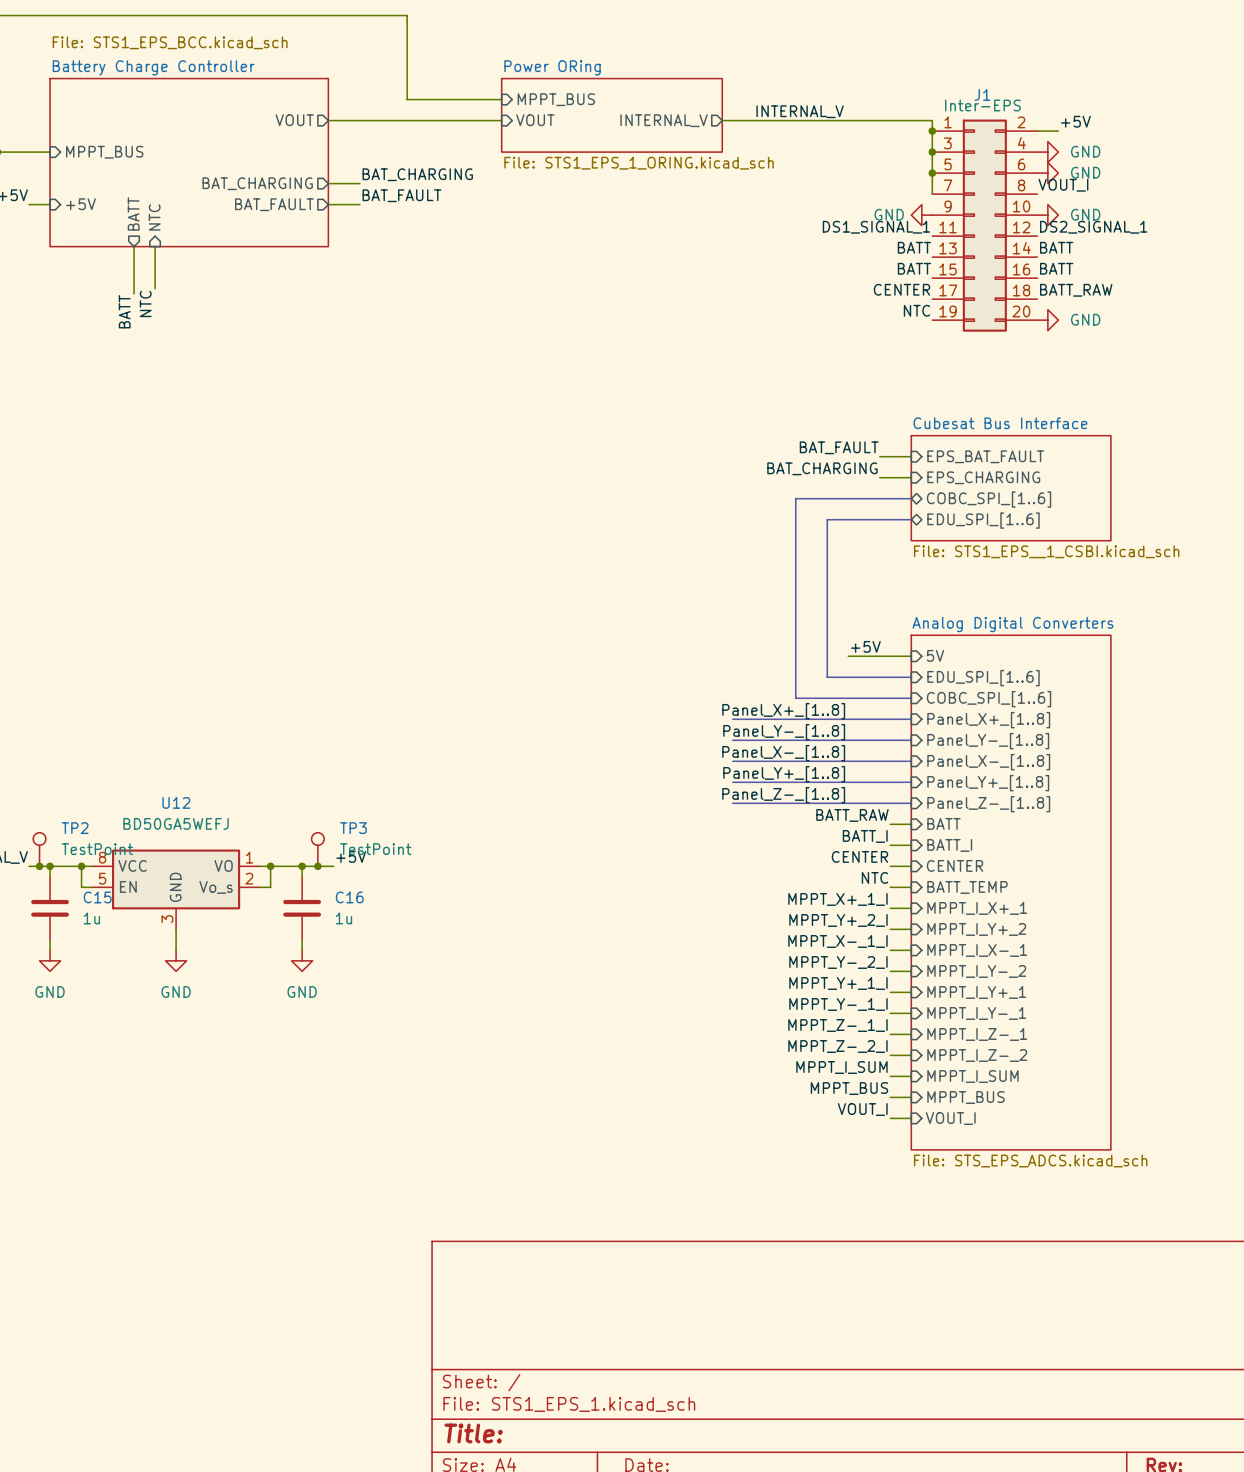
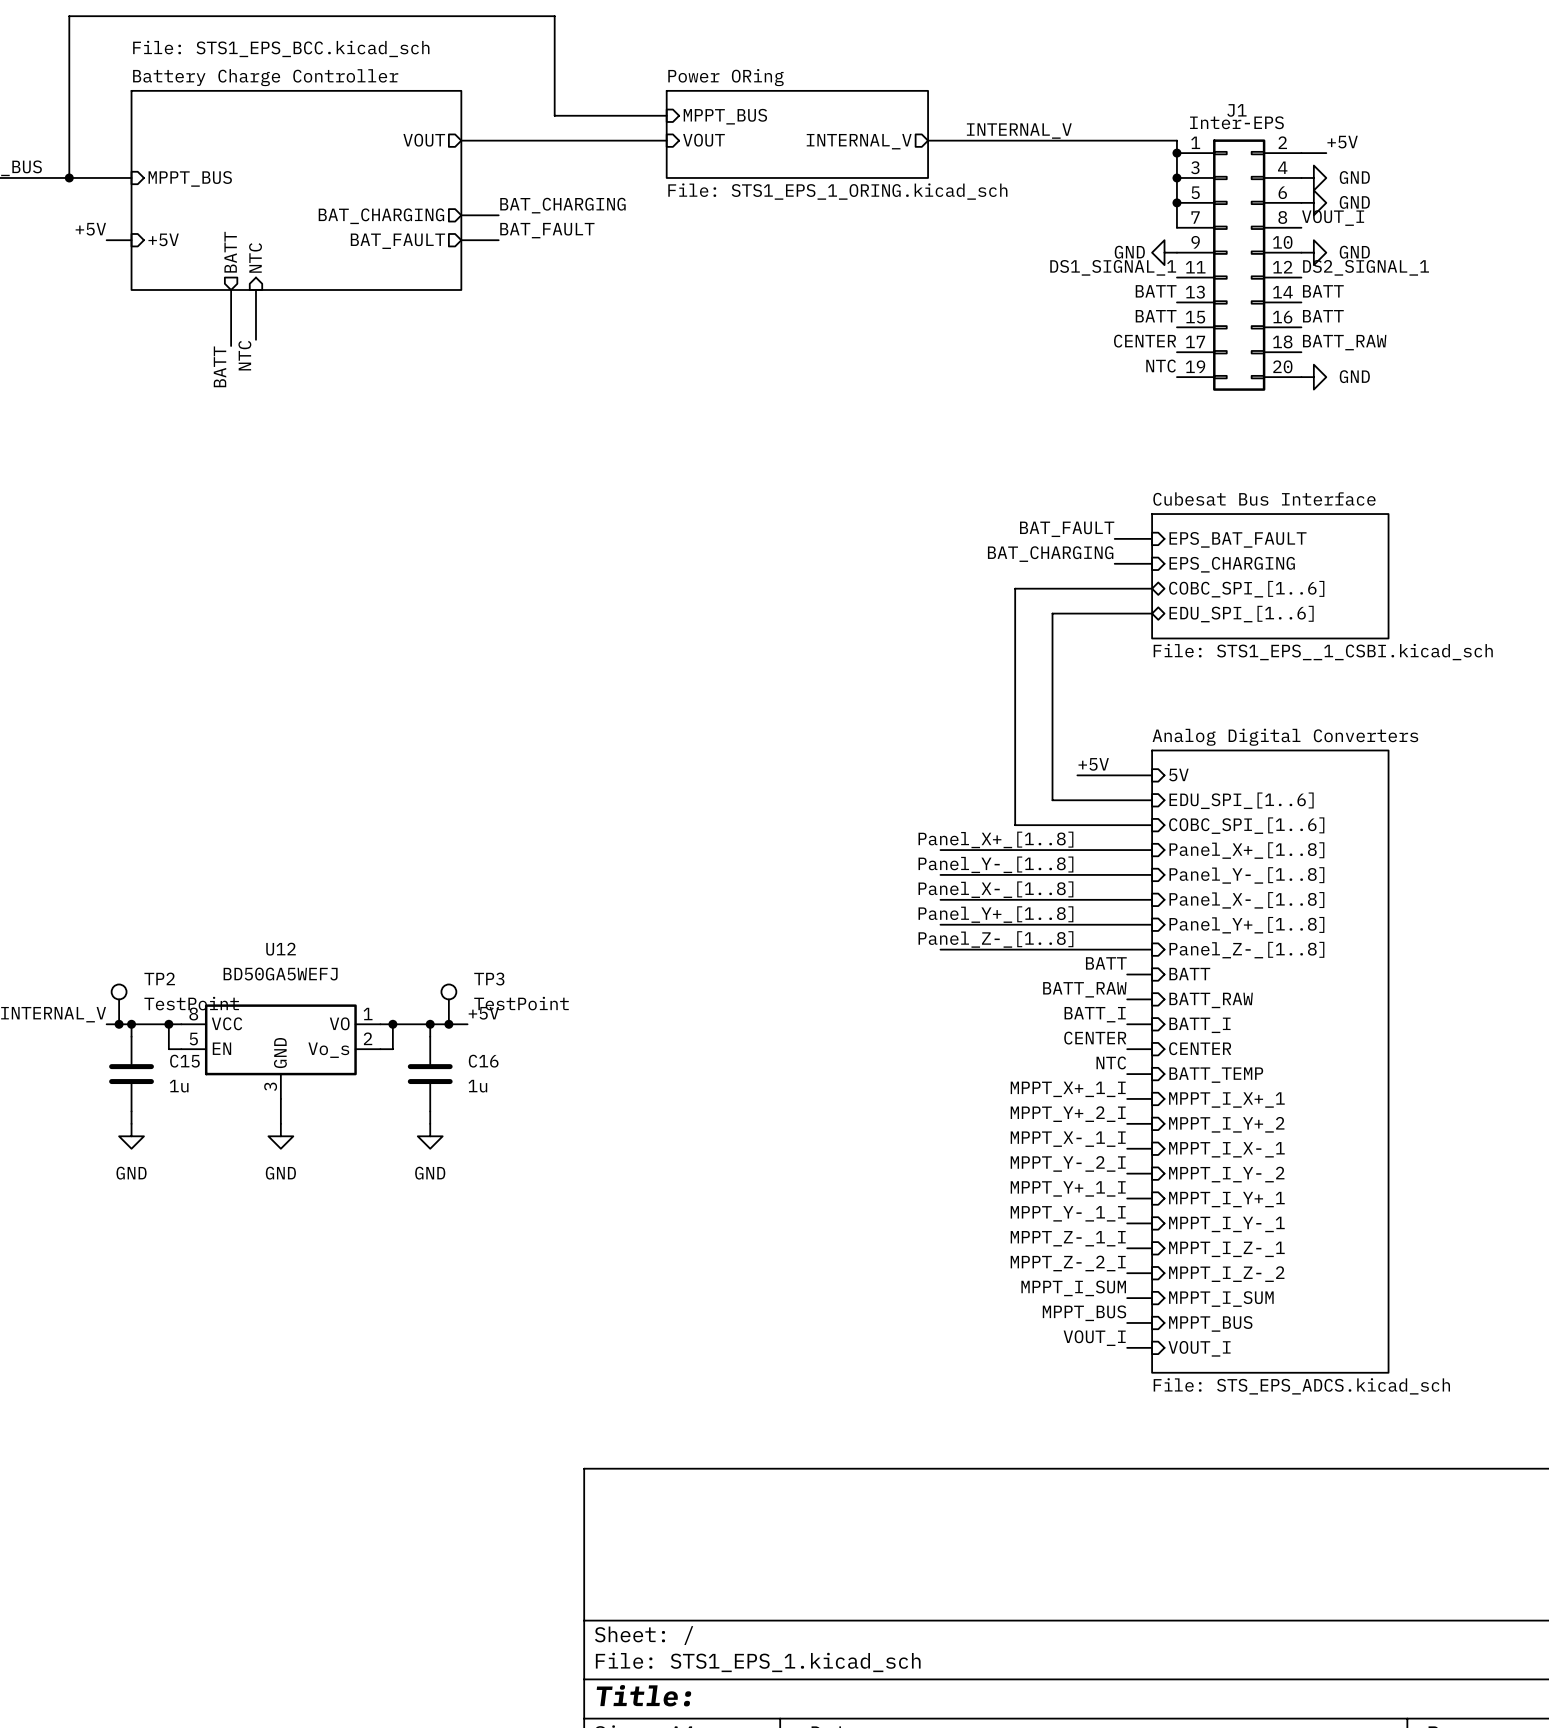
sheet Analog Digital Converters shape: [910, 634, 1112, 1151] -> [1151, 749, 1390, 1374]
label: BATT_RAW (852, 815) -> BATT (1106, 963)
label: BATT_I (865, 836) -> BATT_RAW (1084, 989)
sheet pin: BATT_I (949, 845) -> BATT_RAW (1211, 1000)
label: CENTER (859, 856) -> BATT_I (1095, 1014)
sheet pin: CENTER (954, 865) -> BATT_I (1200, 1025)
label: NTC (874, 877) -> CENTER (1095, 1038)
sheet pin: BATT_TEMP (967, 887) -> CENTER (1200, 1048)
label: MPPT_X+_1_I (837, 899) -> NTC (1111, 1062)
sheet pin: MPPT_I_X+_1 (977, 908) -> BATT_TEMP (1216, 1075)
label: MPPT_Y+_2_I (838, 920) -> MPPT_X+_1_I (1068, 1089)
sheet pin: MPPT_I_Y+_2 (976, 929) -> MPPT_I_X+_1 (1226, 1100)
label: MPPT_X-_1_I (837, 941) -> MPPT_Y+_2_I (1068, 1114)
sheet pin: MPPT_I_X-_1 (977, 950) -> MPPT_I_Y+_2 (1226, 1124)
label: MPPT_Y-_2_I (838, 962) -> MPPT_X-_1_I (1068, 1139)
sheet pin: MPPT_I_Y-_2 (976, 971) -> MPPT_I_X-_1 (1226, 1149)
label: MPPT_Y+_1_I (838, 983) -> MPPT_Y-_2_I (1068, 1163)
sheet pin: MPPT_I_Y+_1 (976, 992) -> MPPT_I_Y-_2 (1226, 1174)
label: MPPT_Y-_1_I (838, 1004) -> MPPT_Y+_1_I (1068, 1188)
sheet pin: MPPT_I_Y-_1 (976, 1013) -> MPPT_I_Y+_1 (1226, 1199)
label: MPPT_Z-_1_I (837, 1025) -> MPPT_Y-_1_I (1068, 1213)
sheet pin: MPPT_I_Z-_1 (977, 1034) -> MPPT_I_Y-_1 (1226, 1224)
label: MPPT_Z-_2_I (837, 1046) -> MPPT_Z-_1_I (1068, 1238)
sheet pin: MPPT_I_Z-_2 (977, 1055) -> MPPT_I_Z-_1 (1226, 1249)
label: MPPT_I_SUM (841, 1067) -> MPPT_Z-_2_I (1068, 1263)
sheet pin: MPPT_I_SUM (973, 1076) -> MPPT_I_Z-_2 (1226, 1274)
label: MPPT_BUS (849, 1088) -> MPPT_I_SUM (1073, 1288)
sheet pin: MPPT_BUS (966, 1097) -> MPPT_I_SUM (1221, 1299)
label: VOUT_I (862, 1109) -> MPPT_BUS (1084, 1313)
sheet pin: VOUT_I (950, 1118) -> MPPT_BUS (1210, 1323)
label: none -> VOUT_I (1094, 1338)
wire: none -> (1127, 1347) (1152, 1347)
sheet pin: none -> VOUT_I (1199, 1348)

